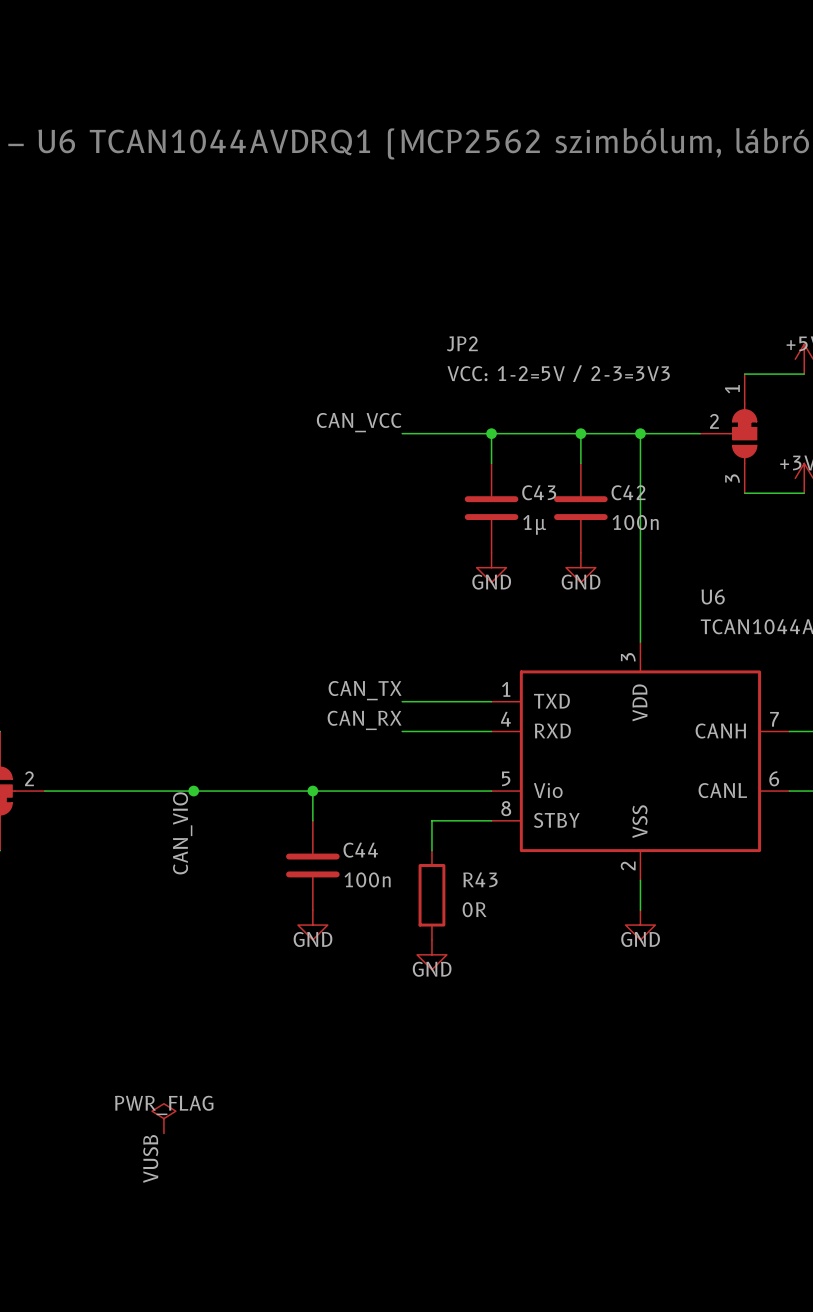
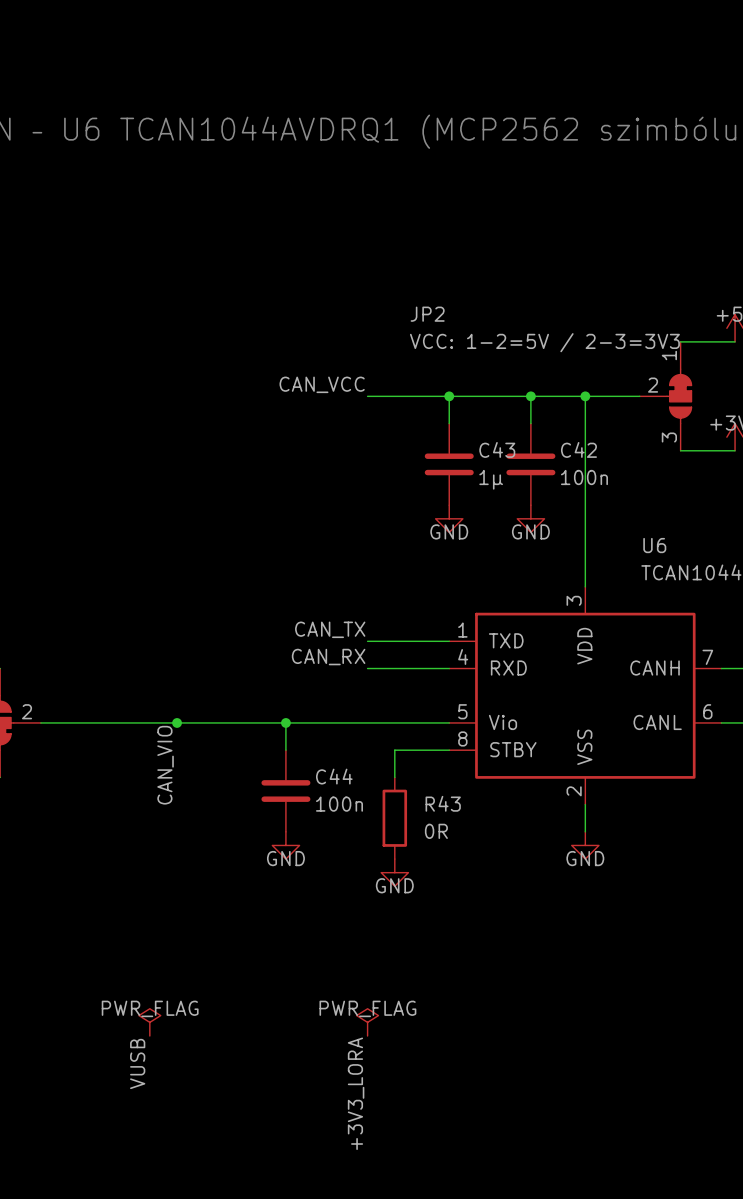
power symbol: none -> PWR_FLAG (367, 1022)
label: none -> +3V3_LORA (356, 1093)

